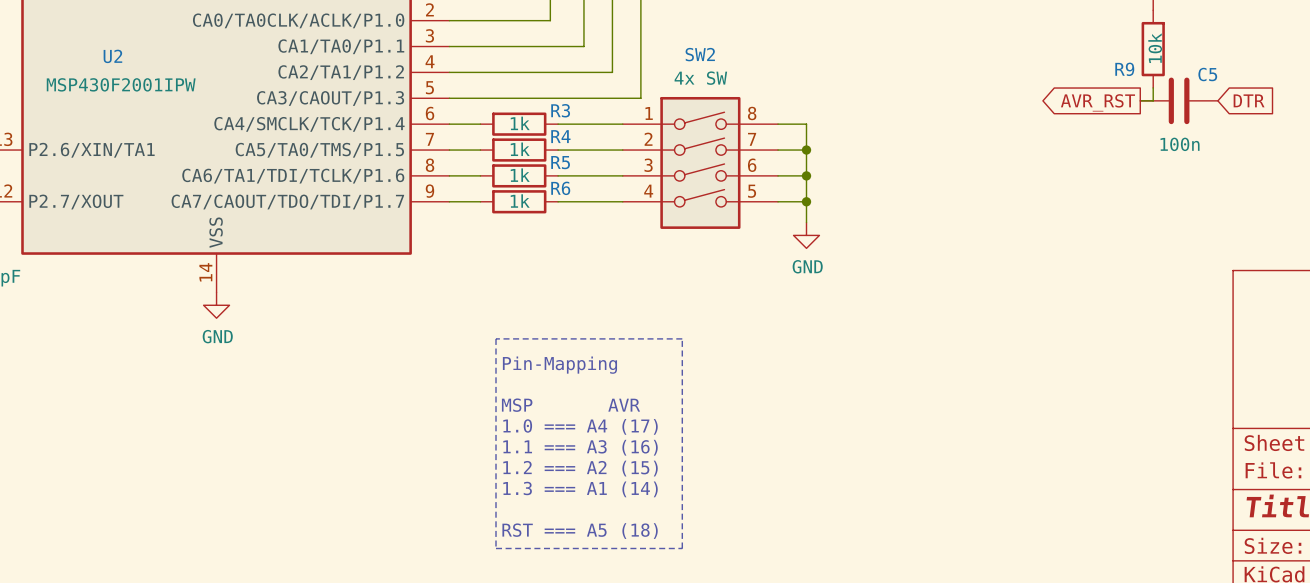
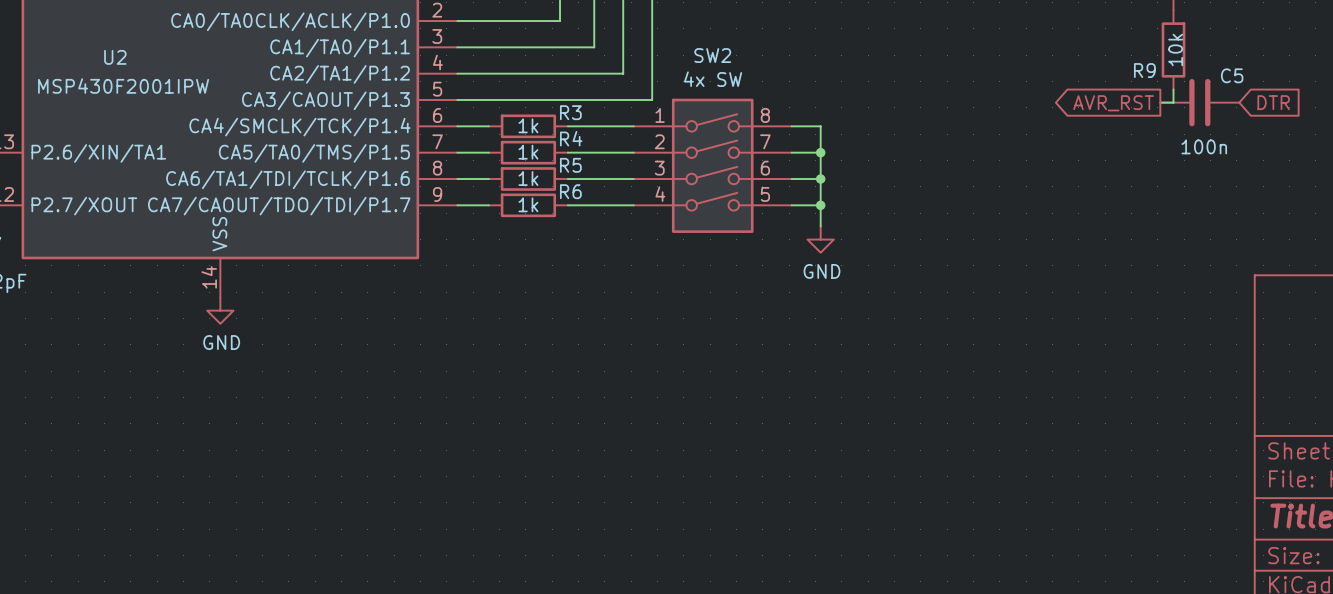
line: (496, 338) (682, 338) (682, 548) (496, 548) (496, 338) -> none
text: Pin-Mapping (559, 365) -> none
text: MSP AVR (570, 405) -> none
text: 1.0 === A4 (17) (580, 426) -> none
text: 1.1 === A3 (16) (580, 447) -> none
text: 1.2 === A2 (15) (580, 468) -> none
text: 1.3 === A1 (14) (580, 489) -> none
text: RST === A5 (18) (580, 531) -> none

